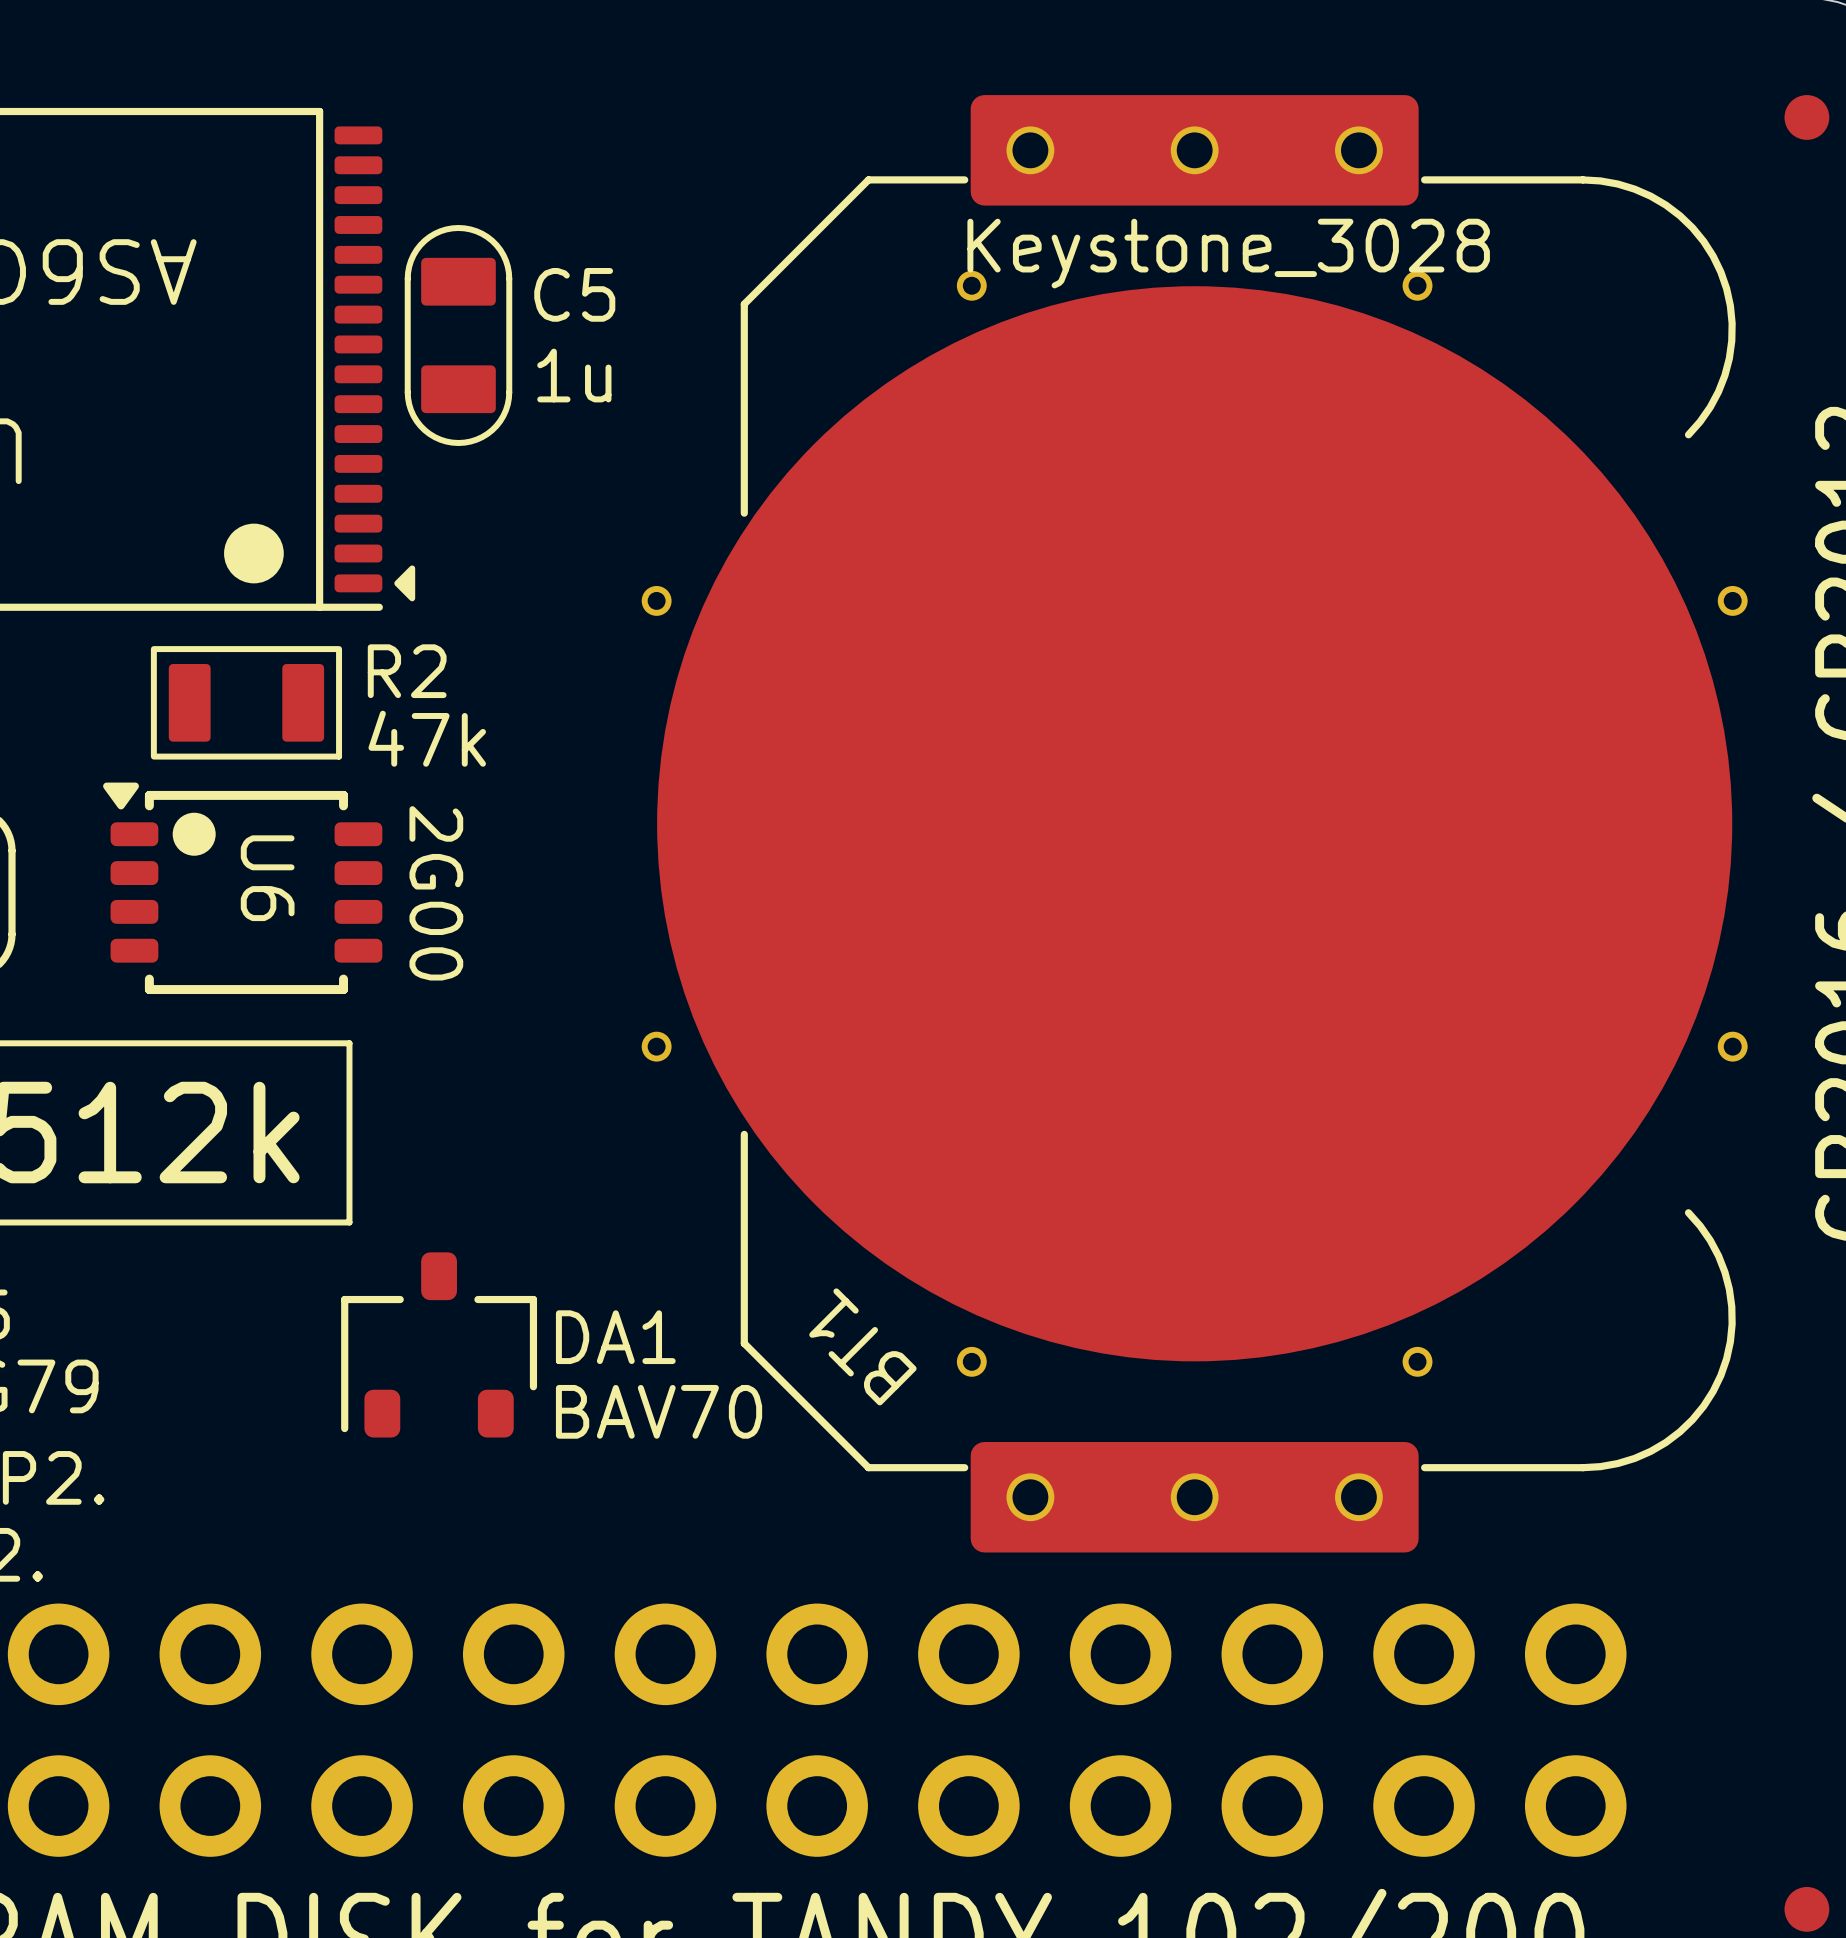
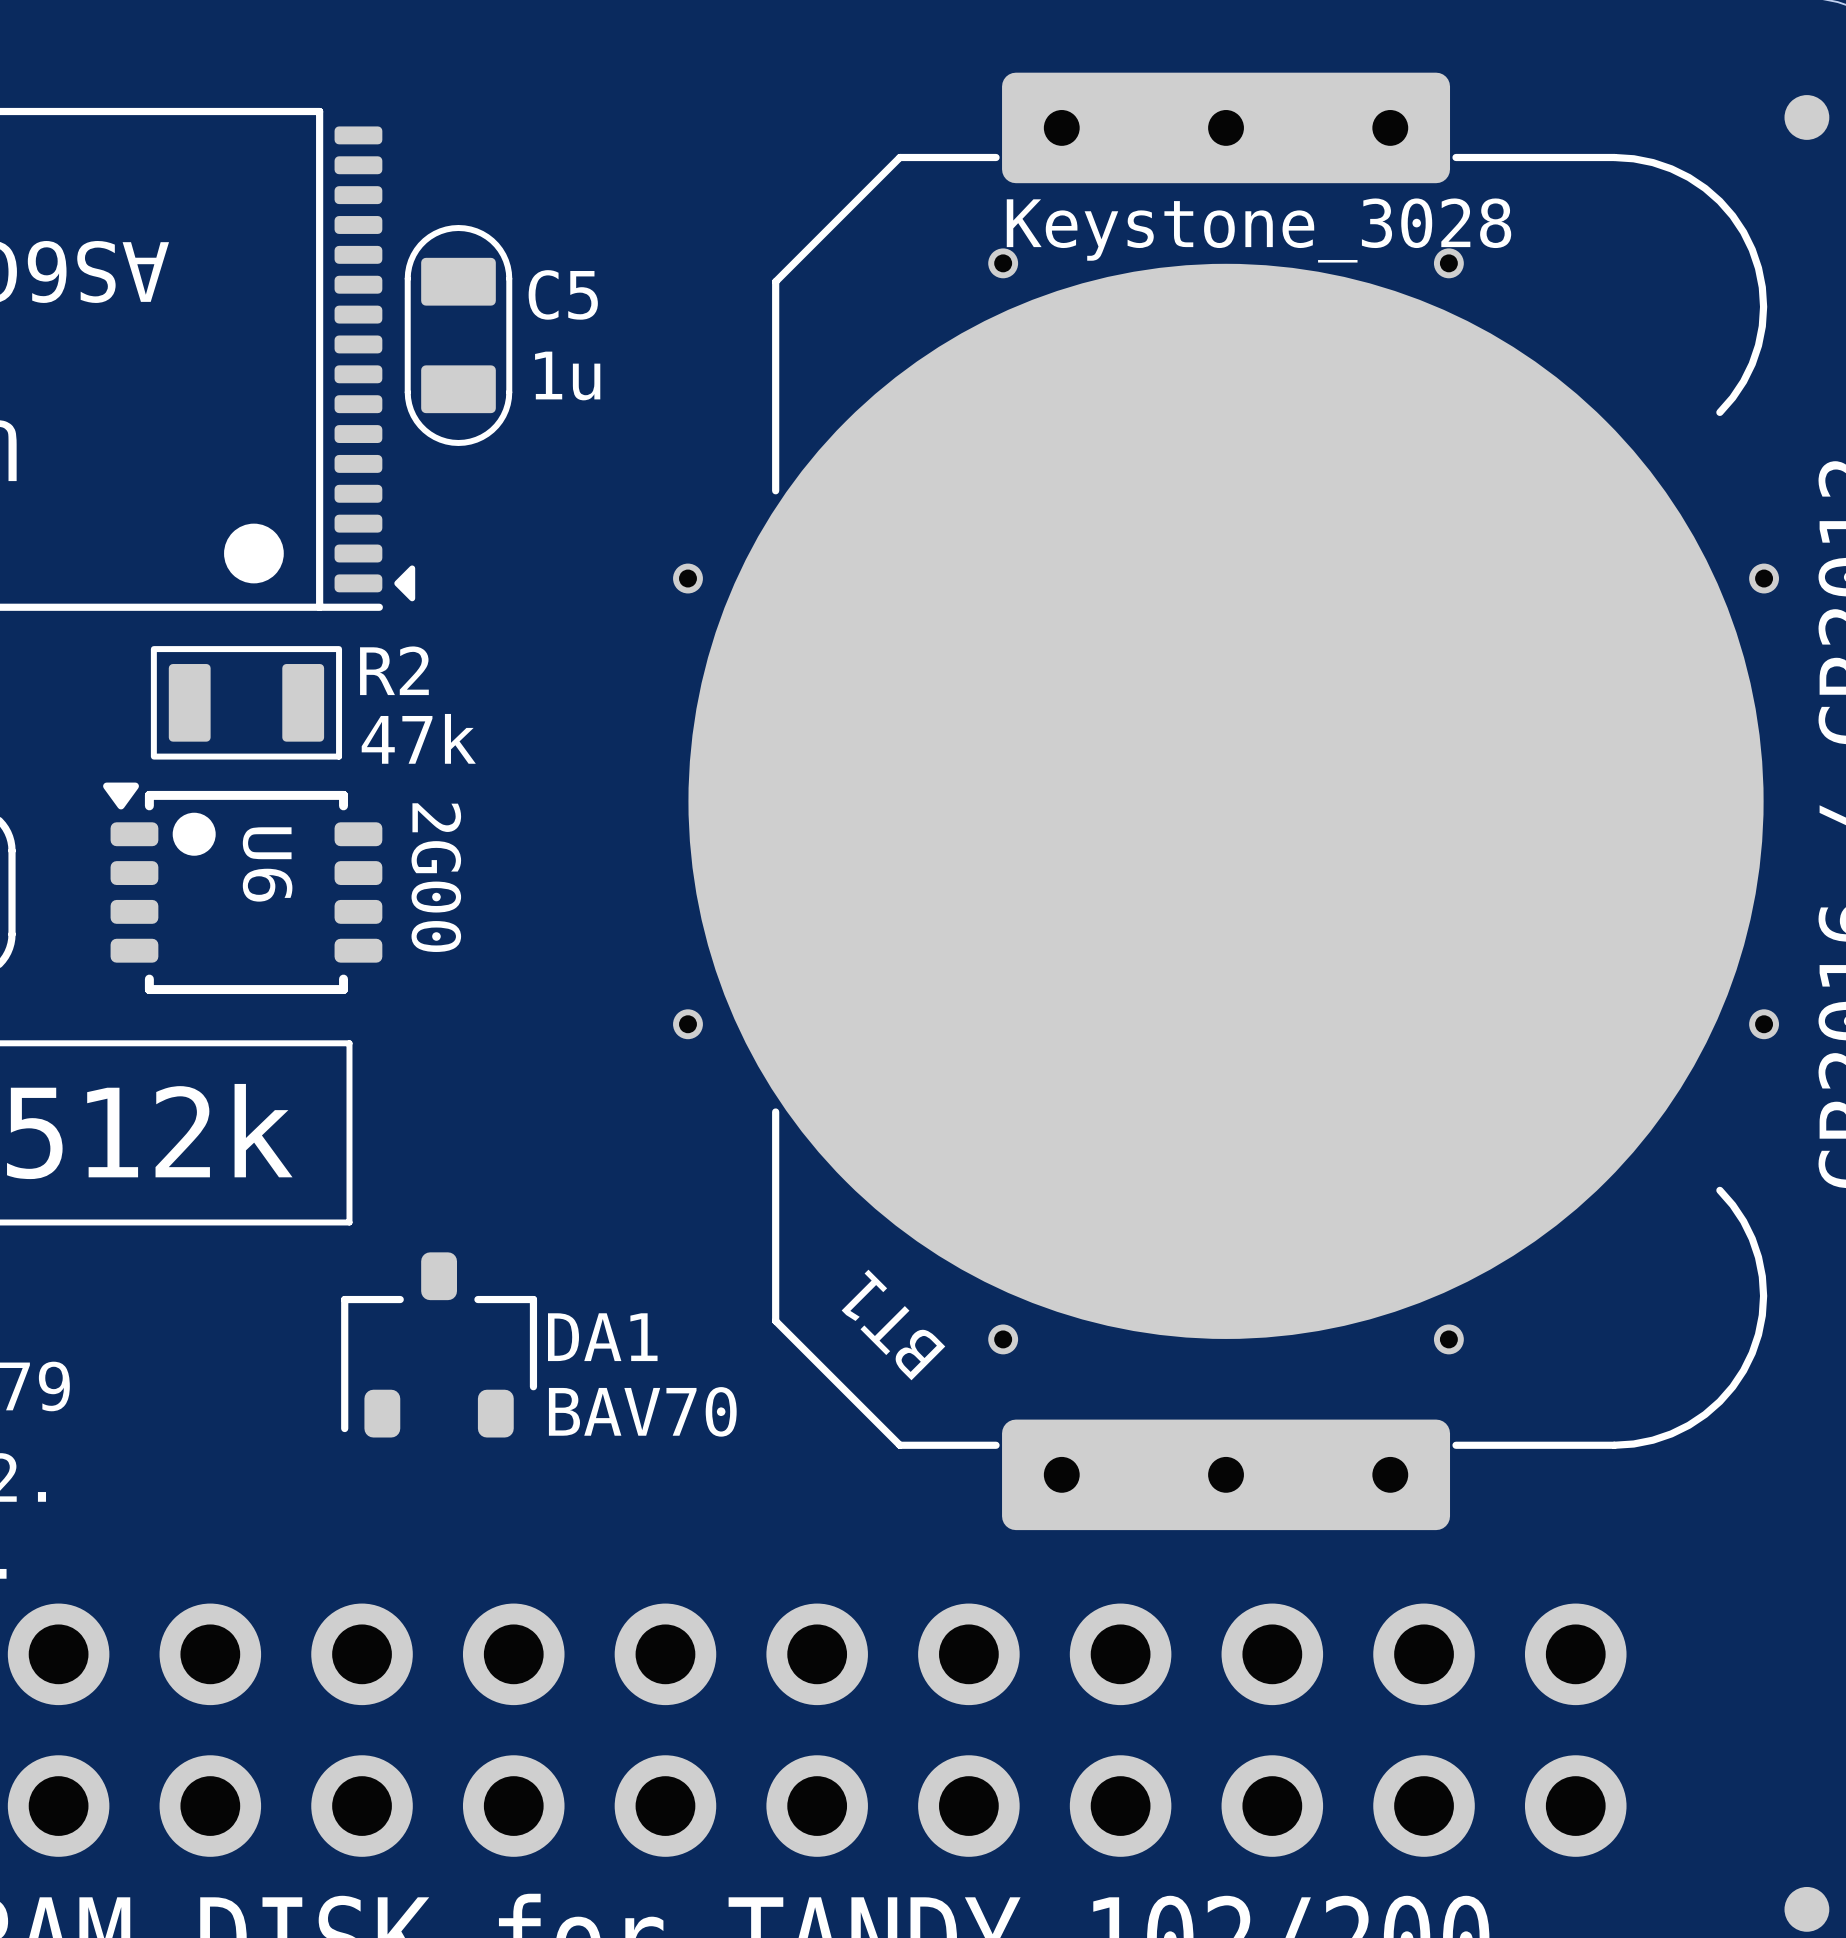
BT1 footprint: [641, 95, 1748, 1553] -> [673, 72, 1780, 1531]
BT1 value position: Keystone_3028 (1228, 253) -> Keystone_3028 (1258, 230)
BT1 name position: BT1 (862, 1346) -> BT1 (893, 1324)

